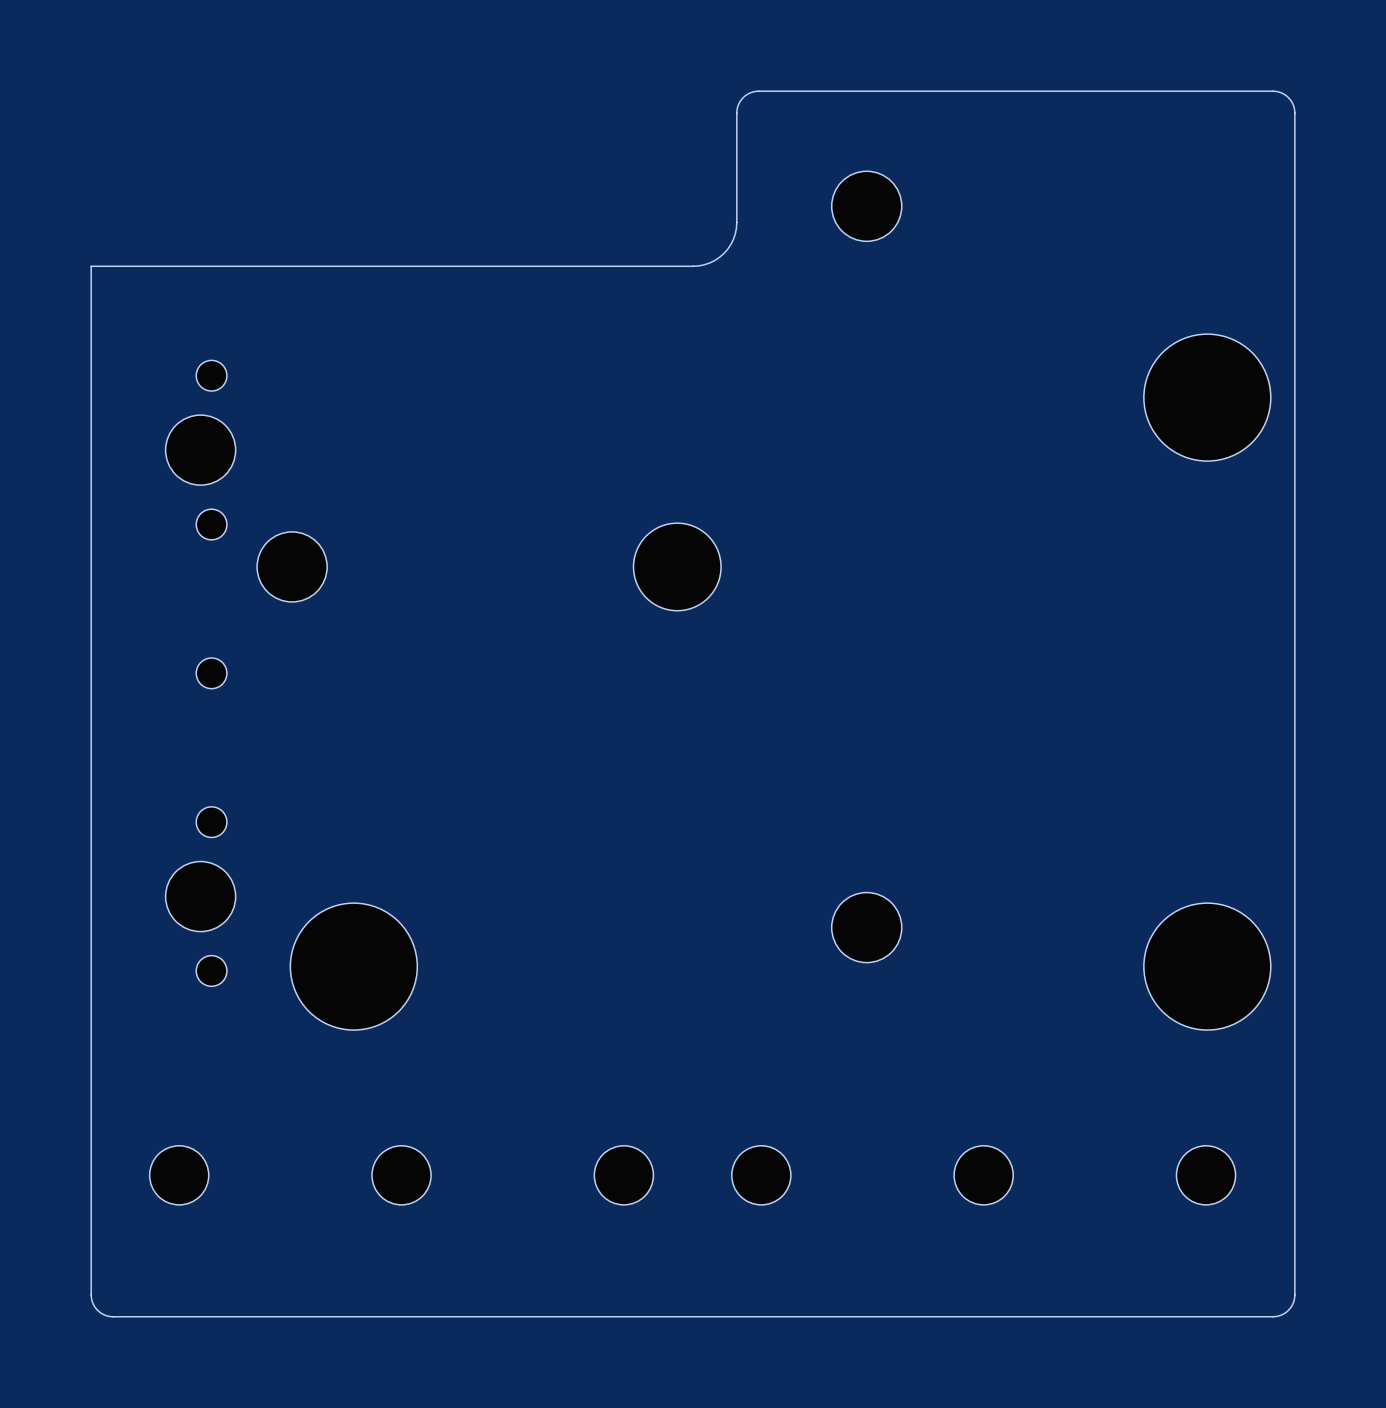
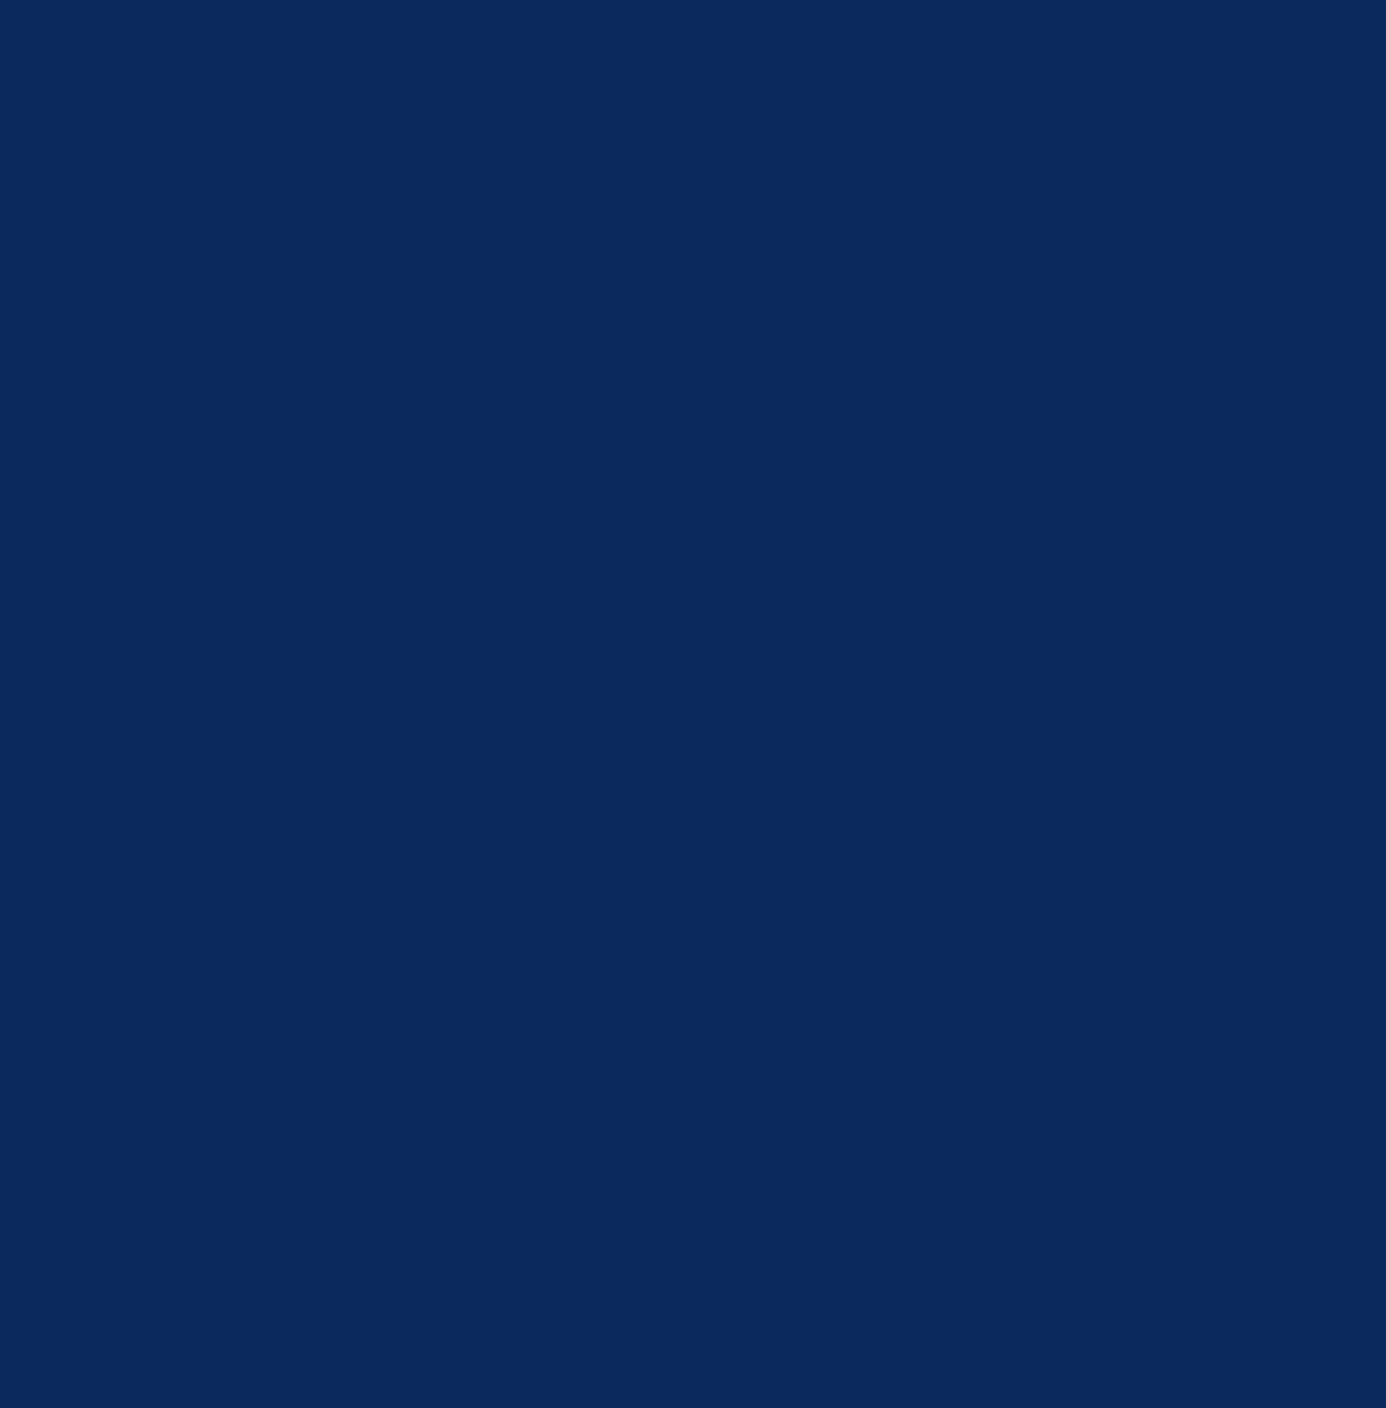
board edge: (1272, 91) (753, 91) (741, 99) (736, 110) (735, 233) (723, 253) (714, 260) (698, 265) (91, 266) (91, 1294) (93, 1304) (97, 1310) (103, 1314) (113, 1316) (1272, 1316) (1281, 1315) (1288, 1310) (1293, 1303) (1294, 1294) (1294, 113) (1292, 103) (1288, 97) (1282, 93) (1272, 91) -> none
part: (866, 206) -> none
part: (211, 375) -> none
part: (1207, 397) -> none
part: (200, 450) -> none
part: (211, 524) -> none
part: (292, 566) -> none
part: (677, 566) -> none
part: (211, 673) -> none
part: (211, 822) -> none
part: (200, 896) -> none
part: (866, 927) -> none
part: (353, 966) -> none
part: (1207, 966) -> none
part: (211, 970) -> none
part: (179, 1175) -> none
part: (401, 1175) -> none
part: (623, 1175) -> none
part: (761, 1175) -> none
part: (983, 1175) -> none
part: (1206, 1175) -> none

